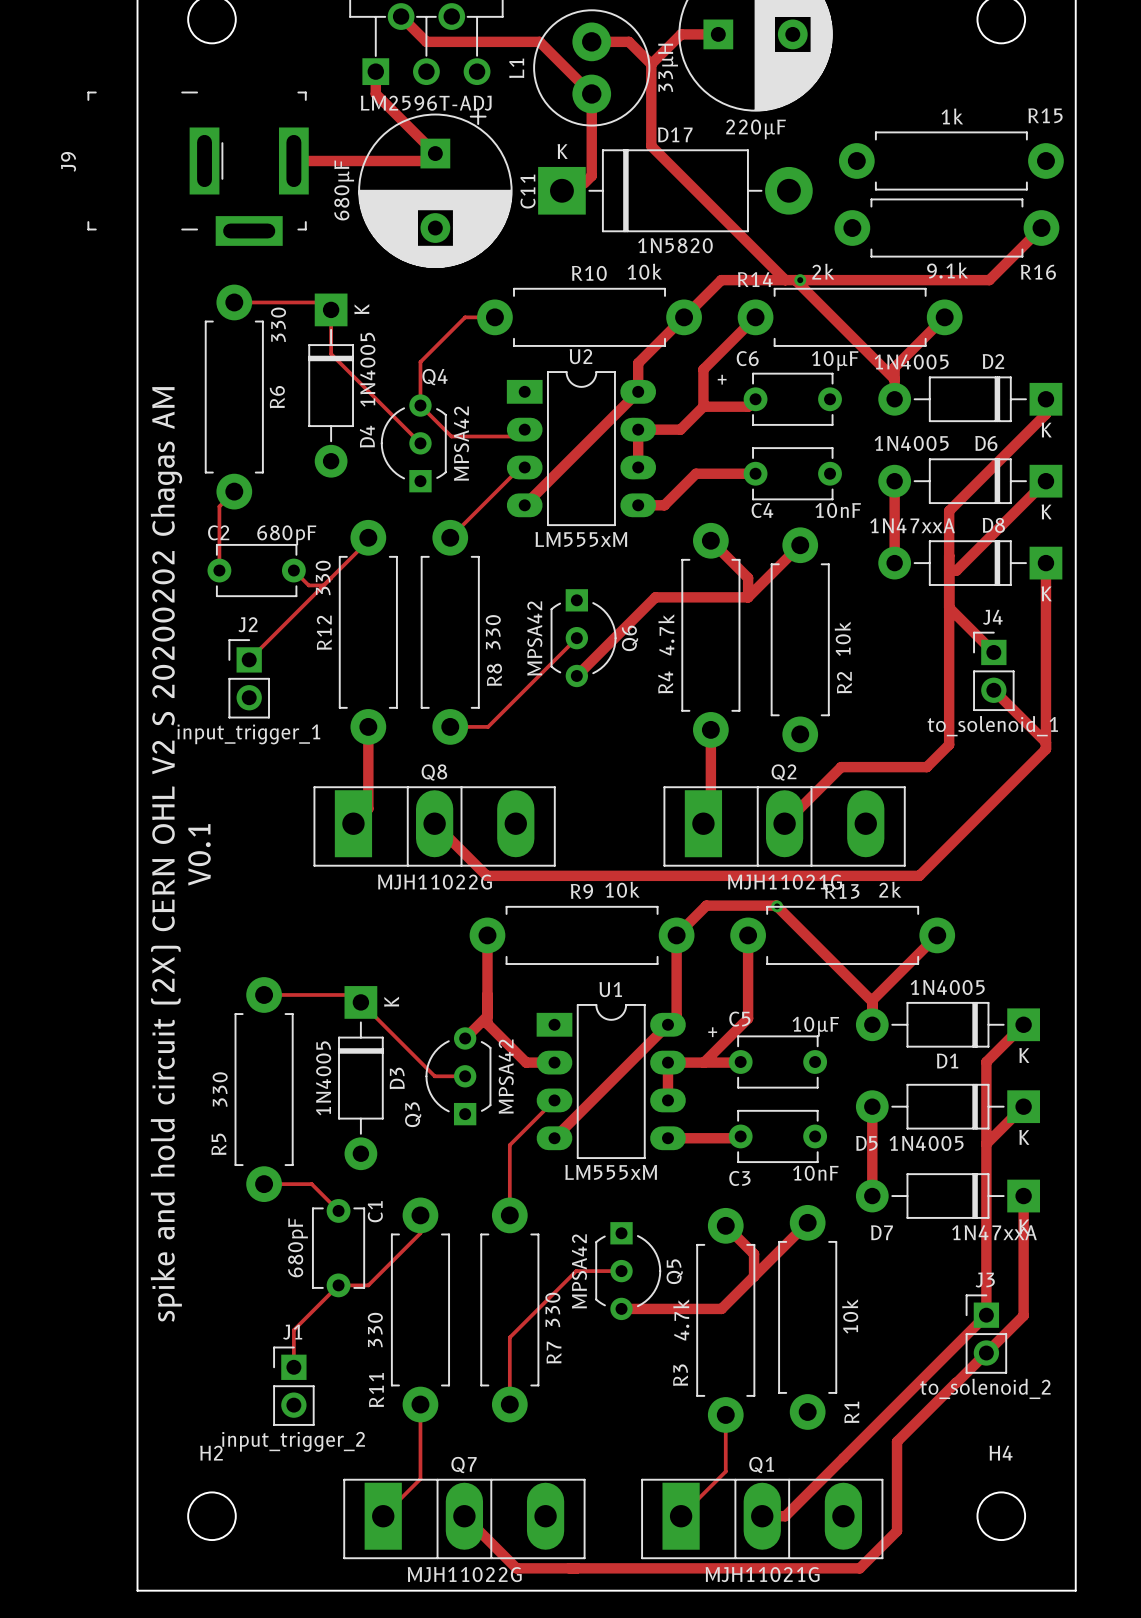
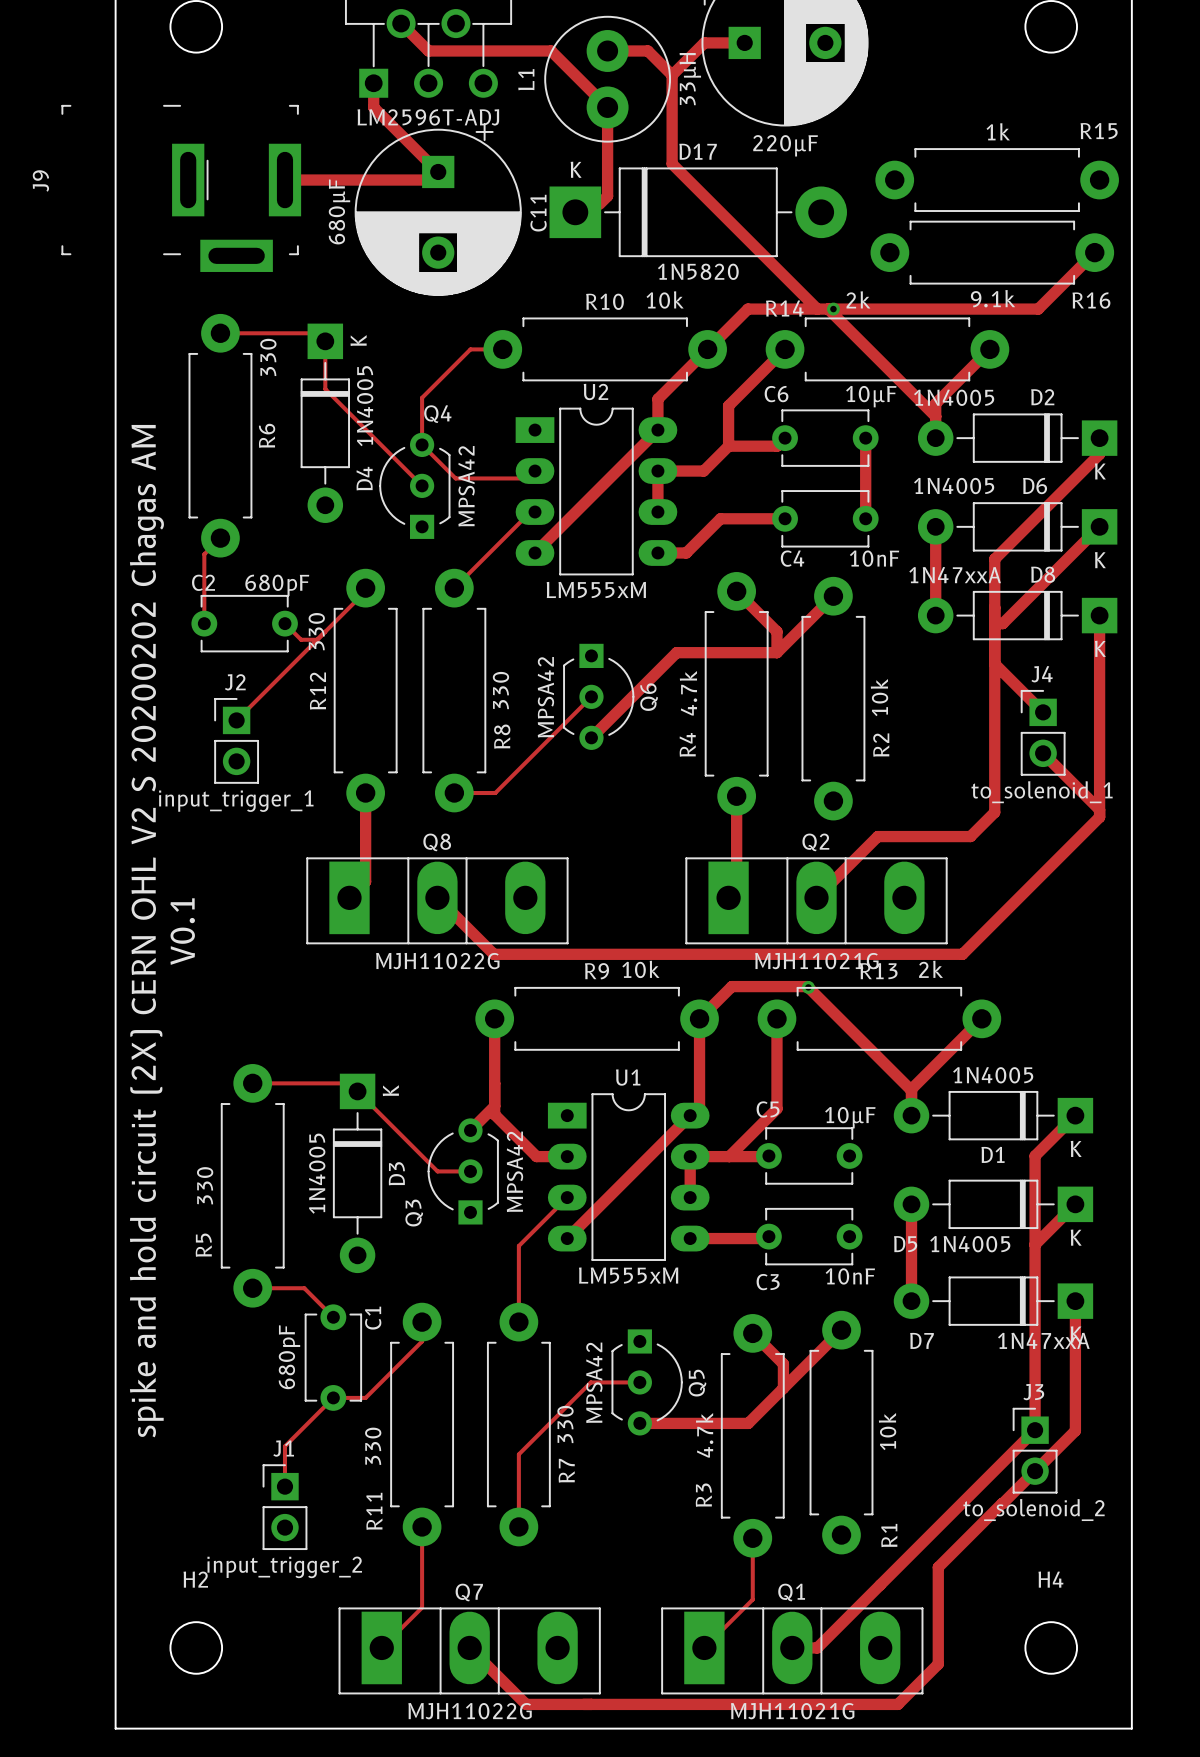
text: + (722, 379) -> none
track: none -> (865, 438) (865, 518)
text: + (712, 1032) -> none

